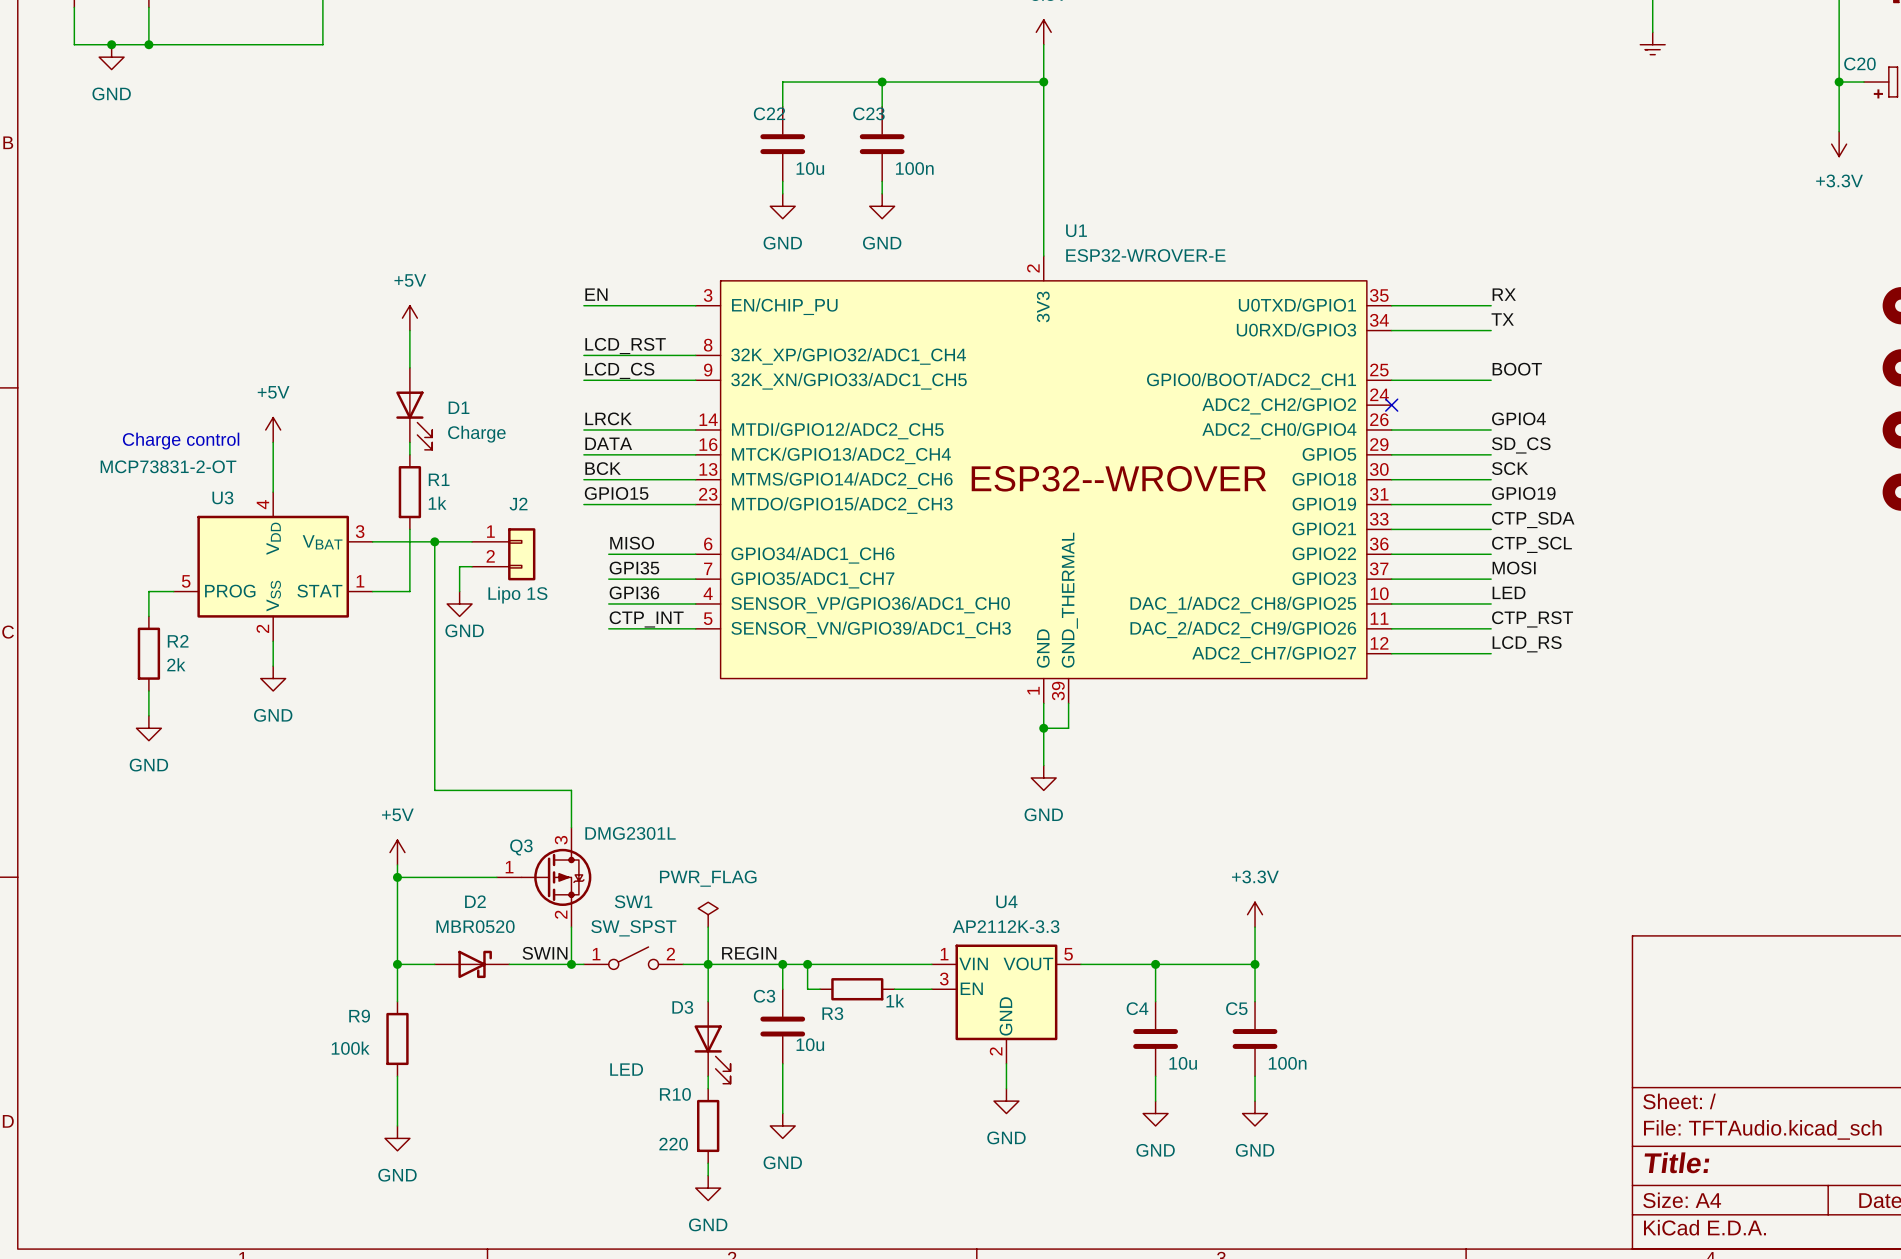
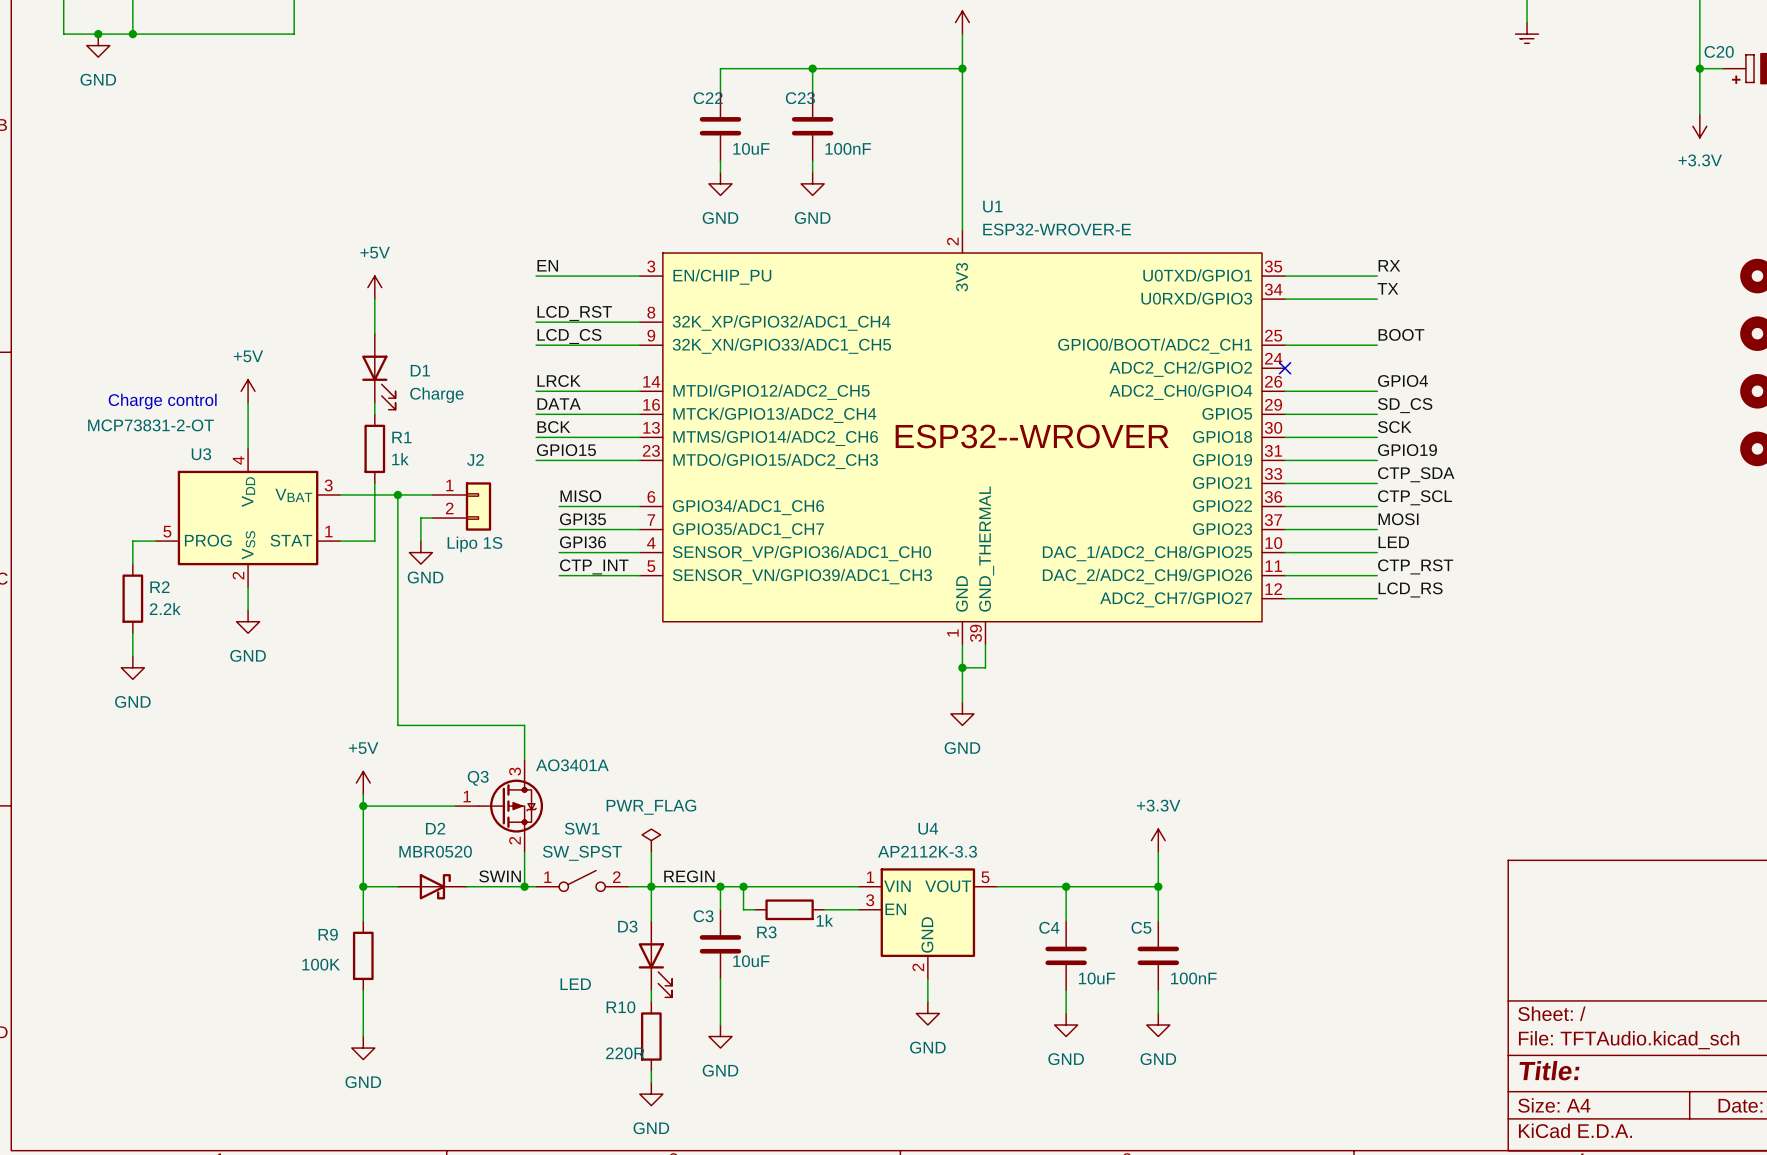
C22 value: 10u (810, 168) -> 10uF (751, 148)
C23 value: 100n (914, 168) -> 100nF (848, 148)
R2 value: 2k (176, 664) -> 2.2k (165, 608)
Q3 value: DMG2301L (630, 833) -> AO3401A (572, 765)
C3 value: 10u (810, 1044) -> 10uF (751, 961)
R9 value: 100k (350, 1048) -> 100K (321, 964)
C4 value: 10u (1183, 1063) -> 10uF (1097, 978)
C5 value: 100n (1287, 1063) -> 100nF (1193, 978)
R10 value: 220 (673, 1144) -> 220R (625, 1053)

